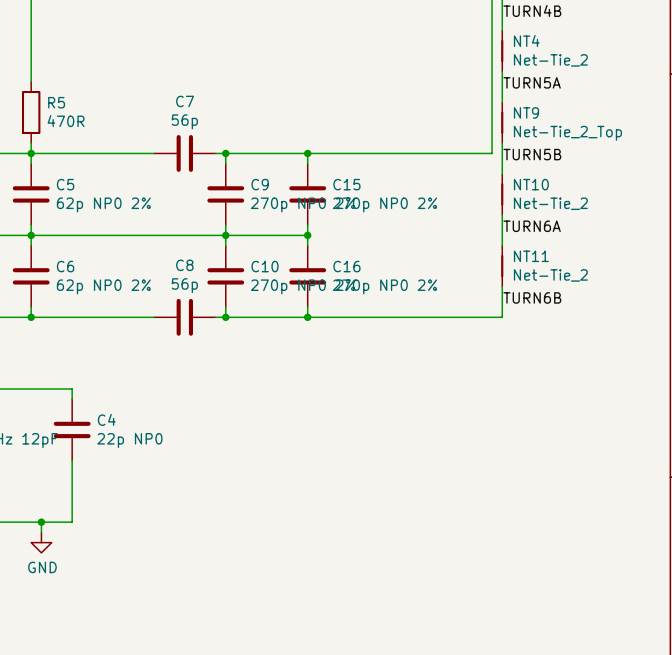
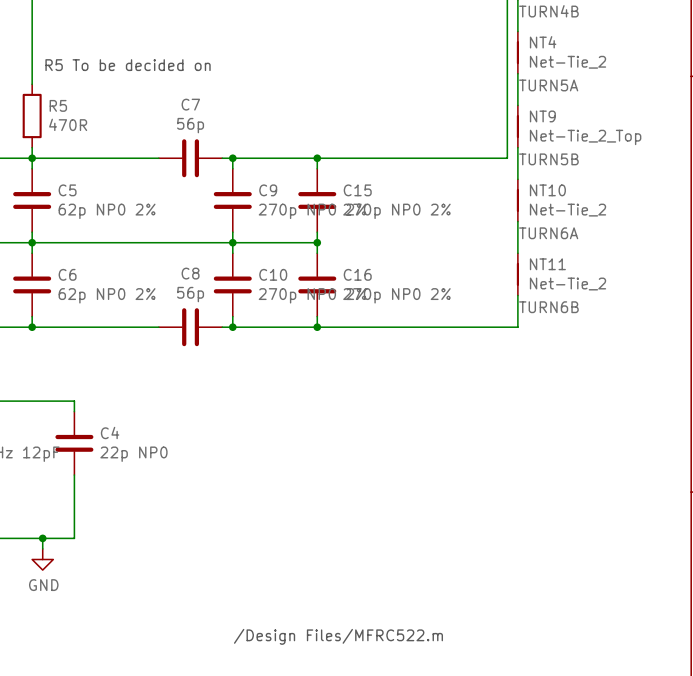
text: none -> R5 To be decided on (128, 65)
text: none -> /Design Files/MFRC522.m (338, 636)

